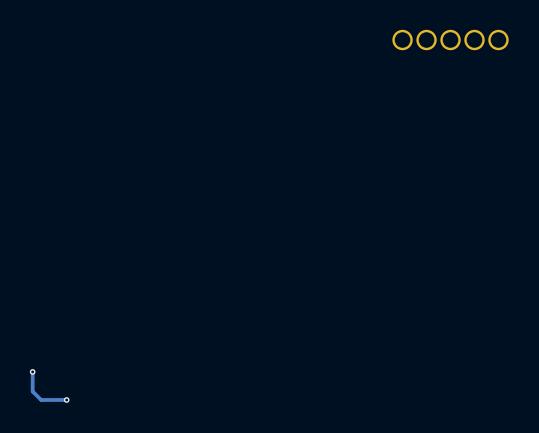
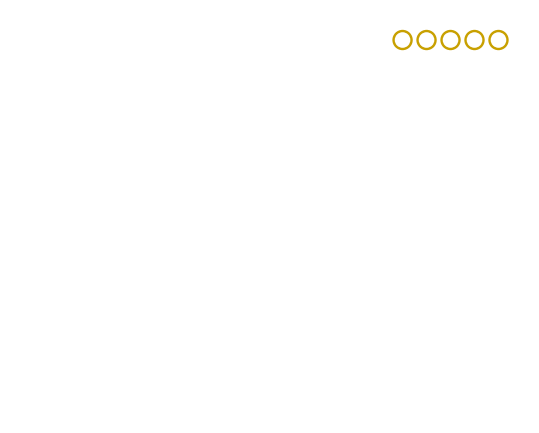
via: (32, 371) -> none
track: (32, 372) (32, 391) (41, 399) (66, 399) -> none
via: (66, 399) -> none

